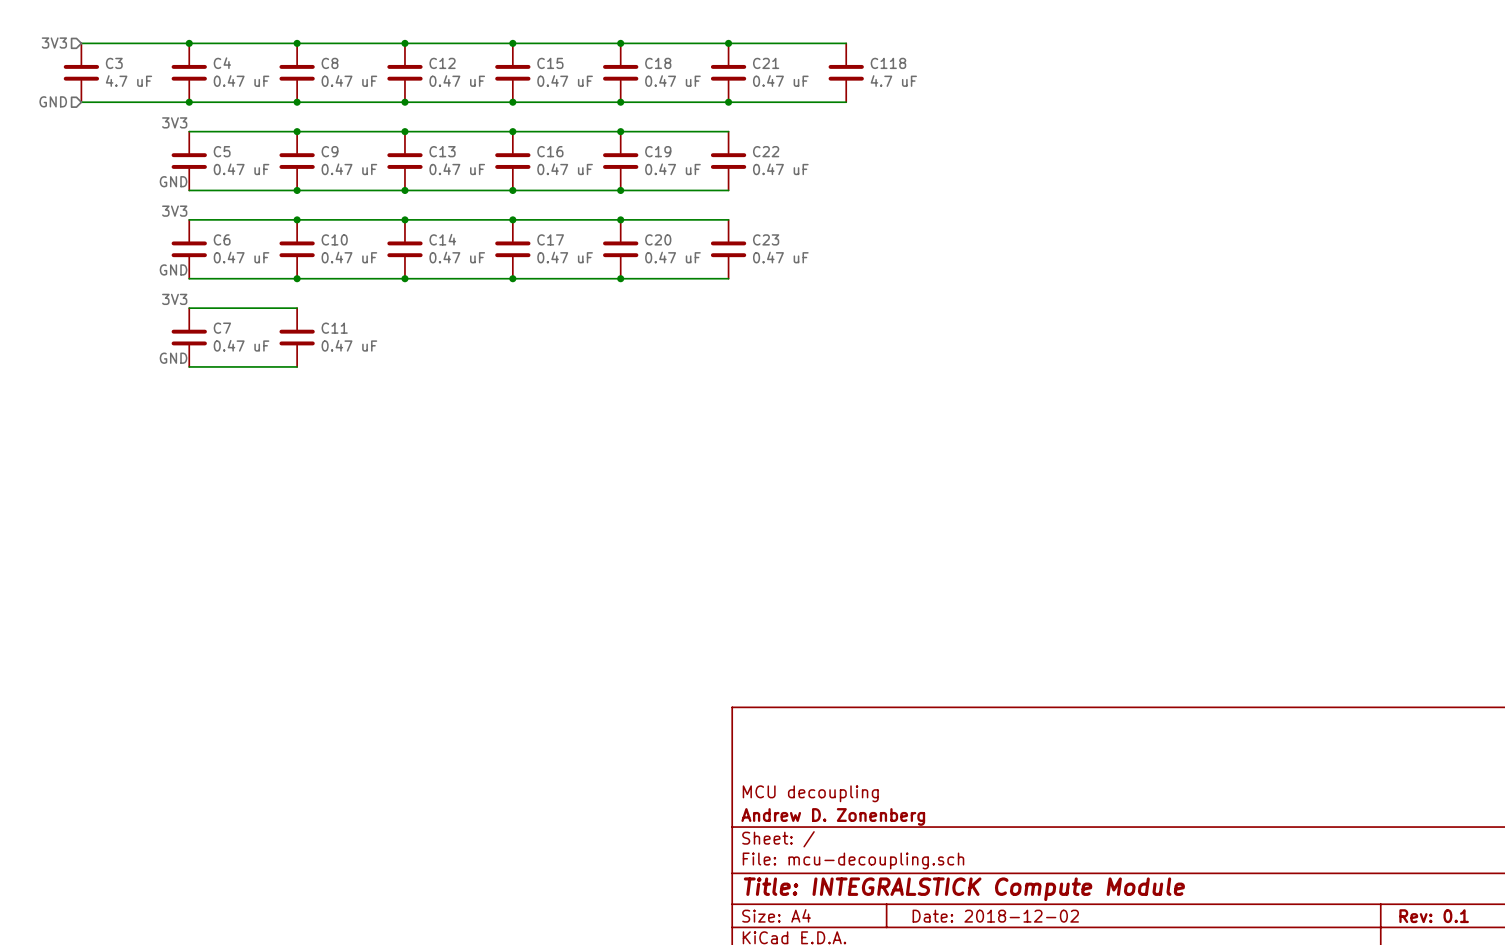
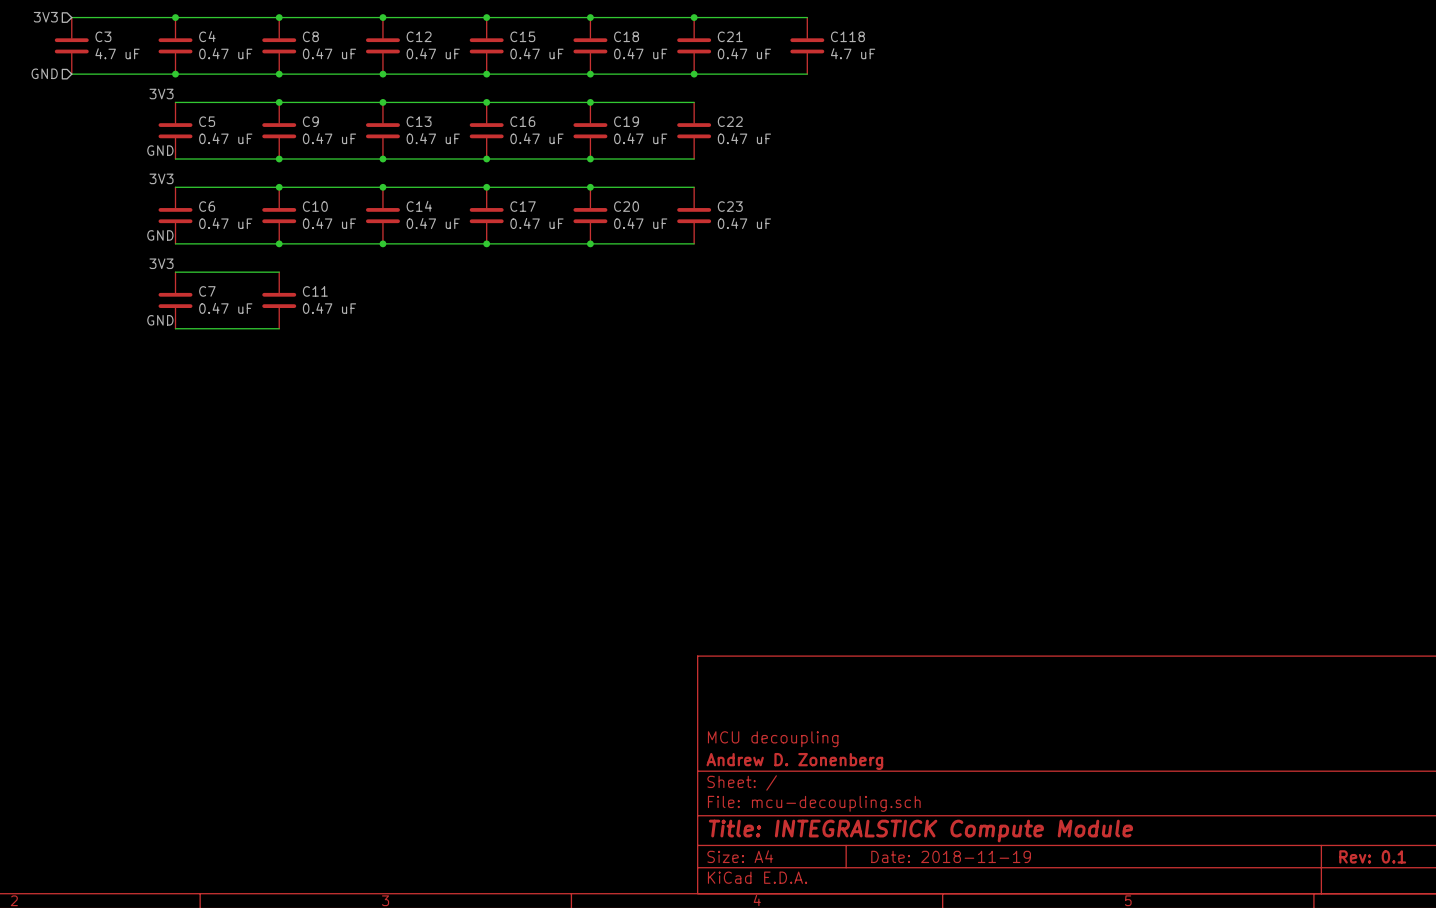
title block: Date: 2018-12-02 (995, 916) -> Date: 2018-11-19 (951, 856)

